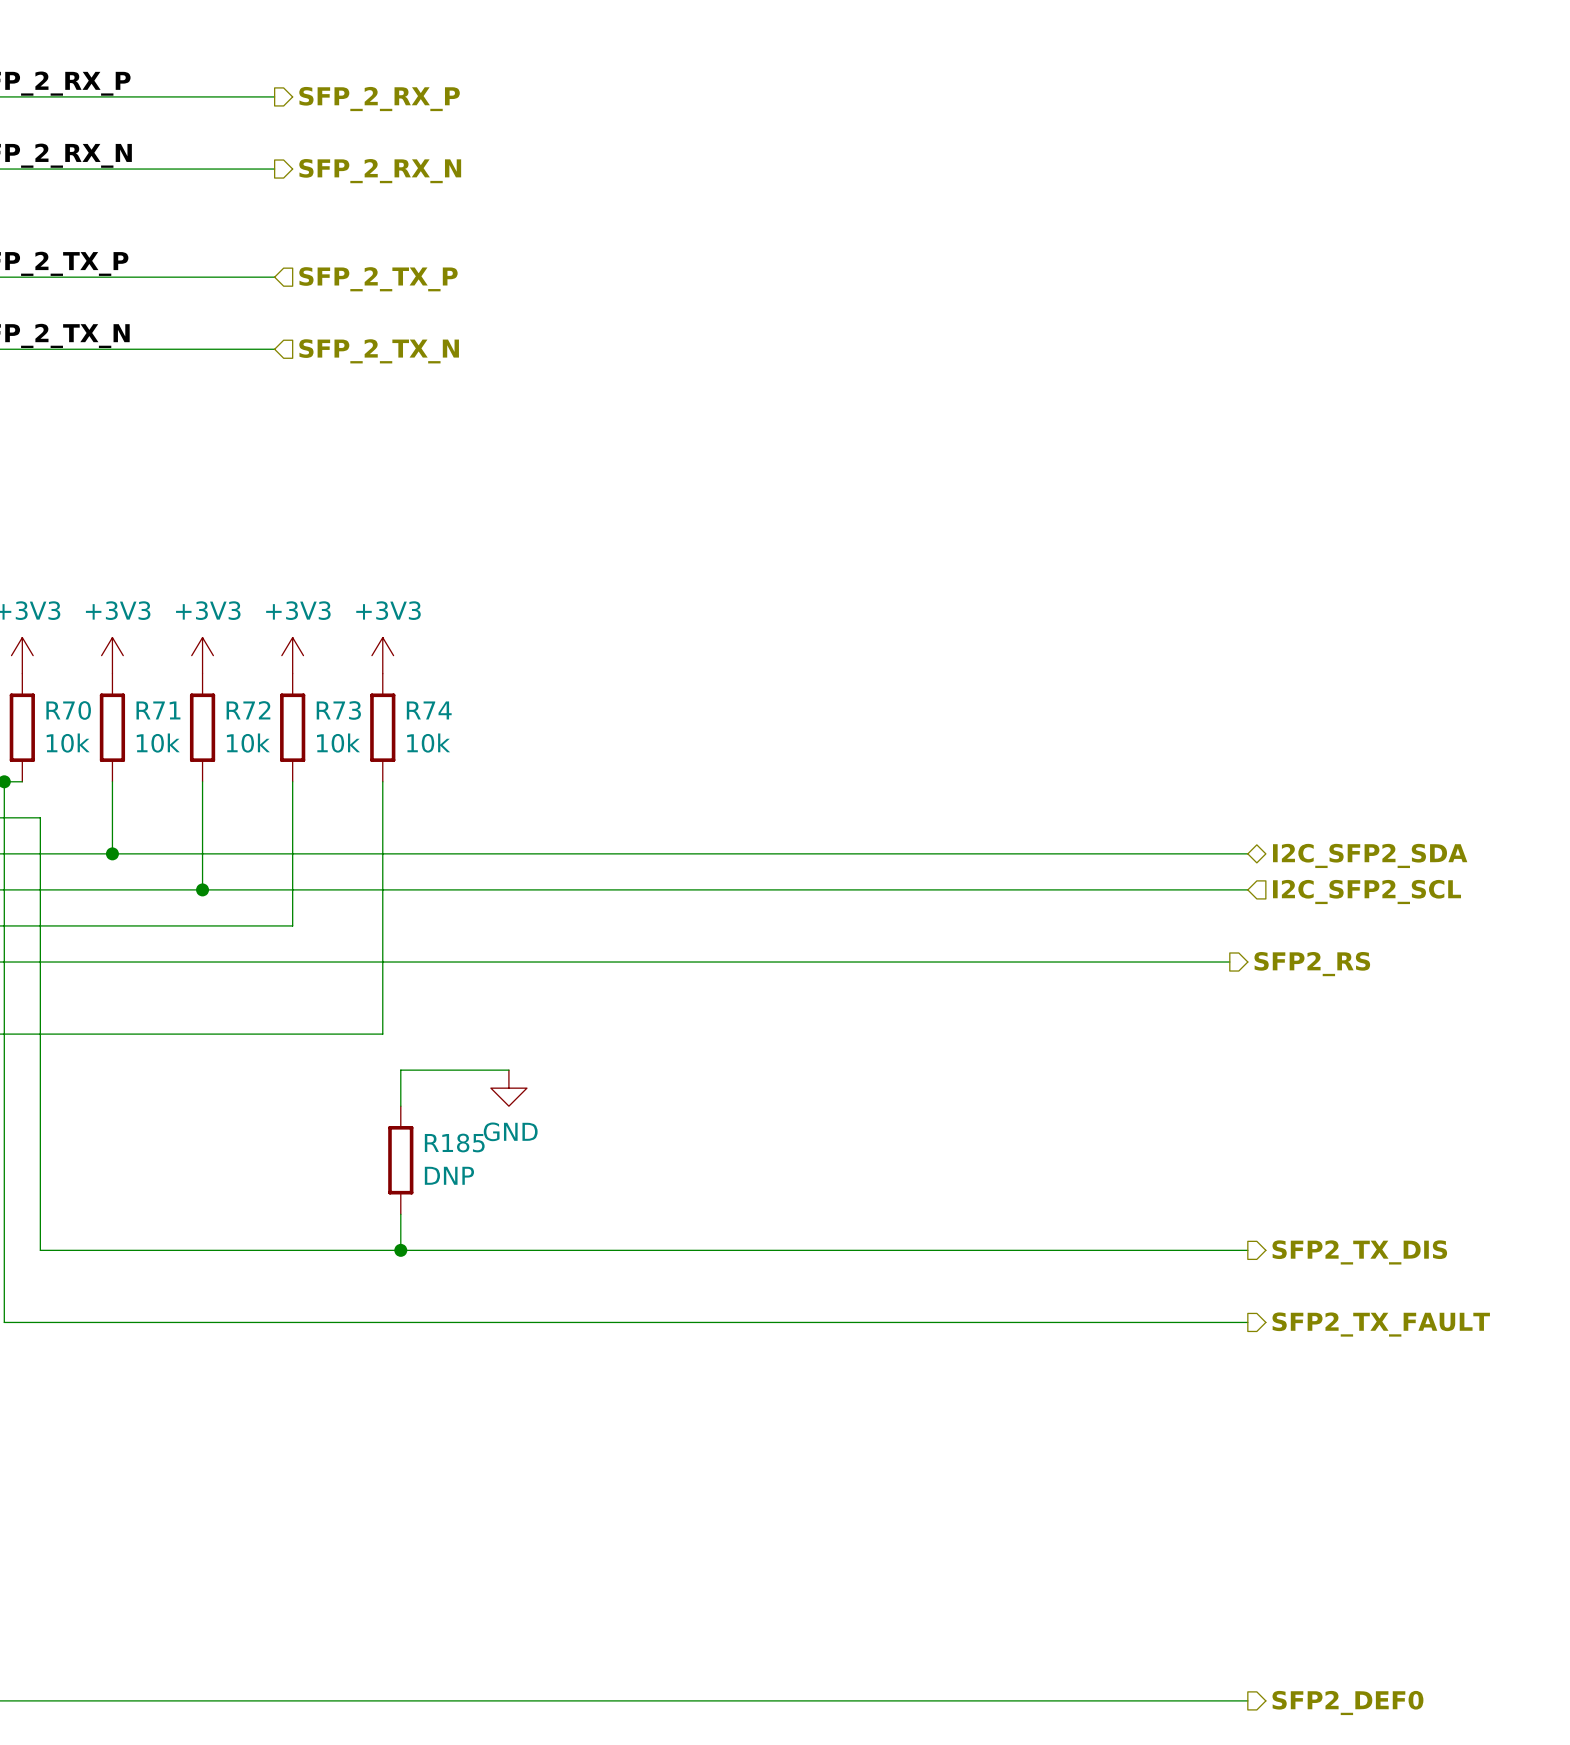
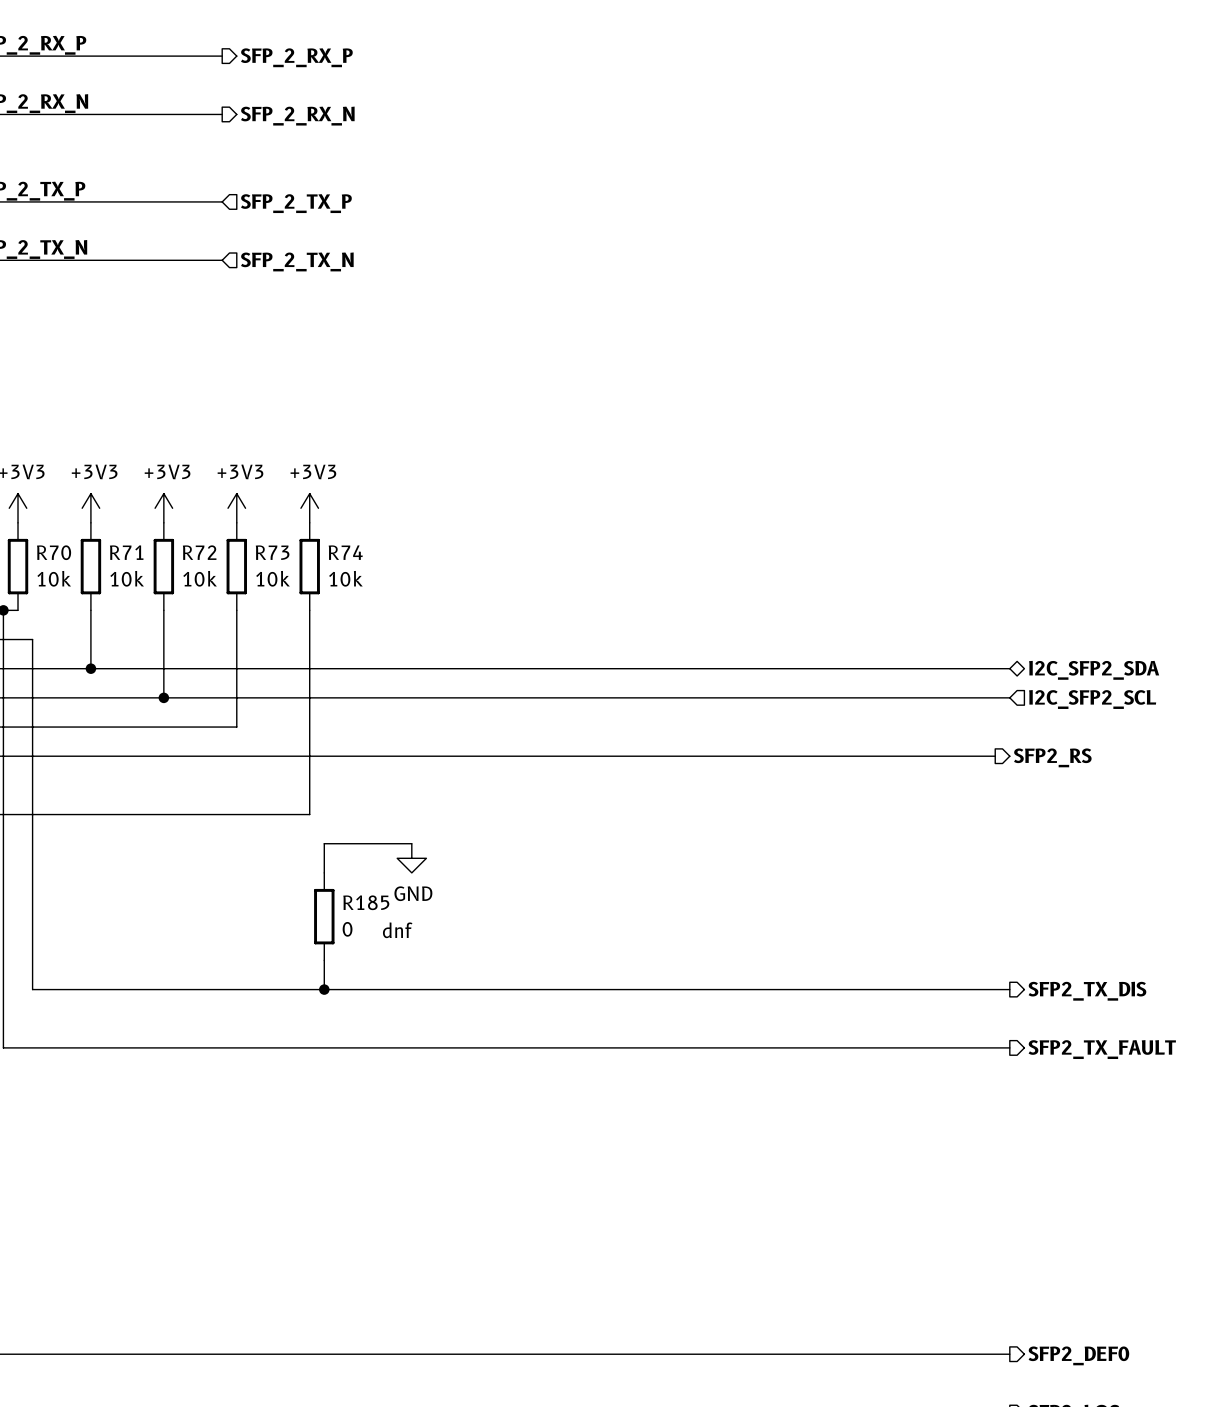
R185 text: DNP (449, 1175) -> 0 (347, 929)
R185 text: none -> dnf (397, 930)

